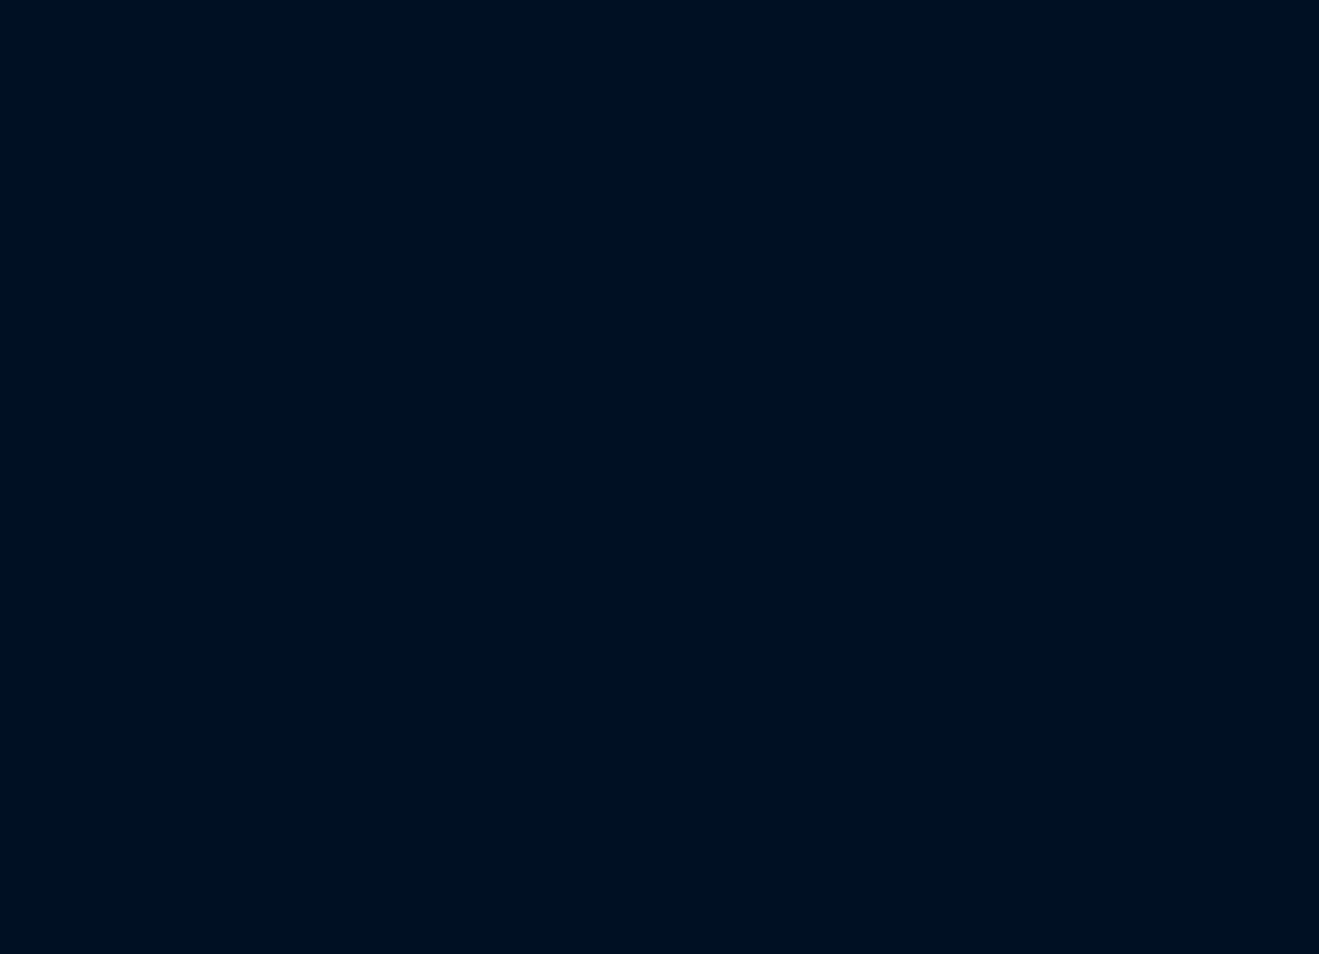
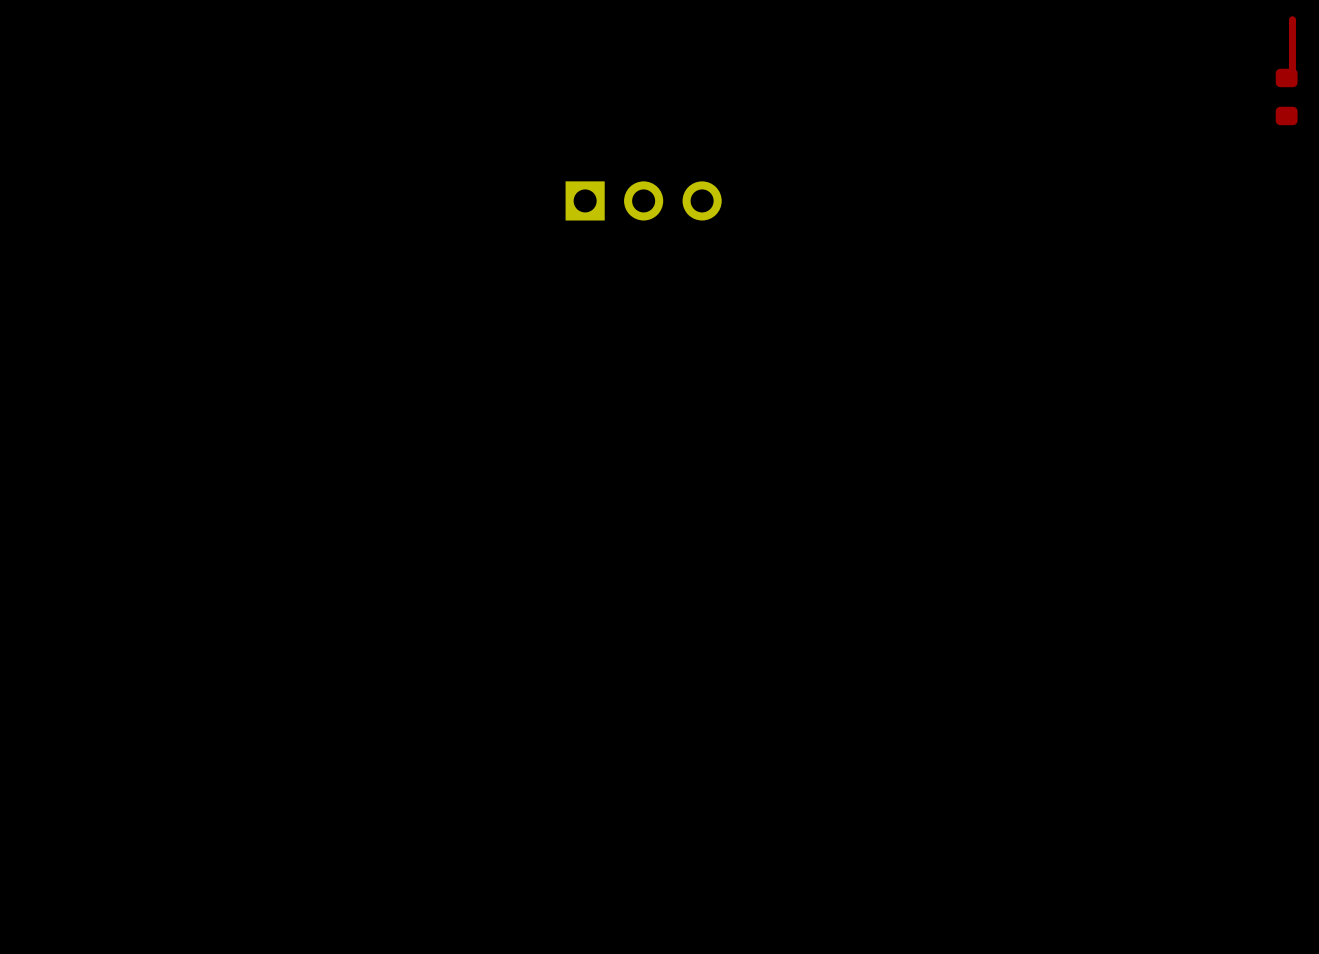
top track: none -> (1292, 19) (1292, 72) (1286, 77)
part: none -> (1286, 96)
part: none -> (643, 200)

